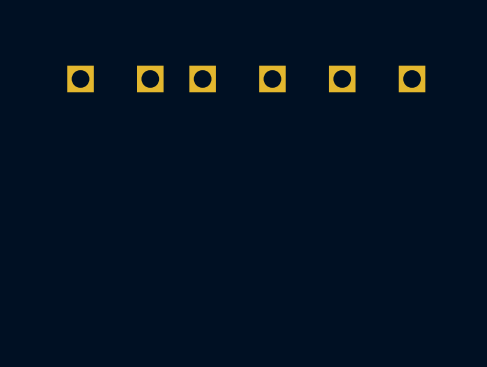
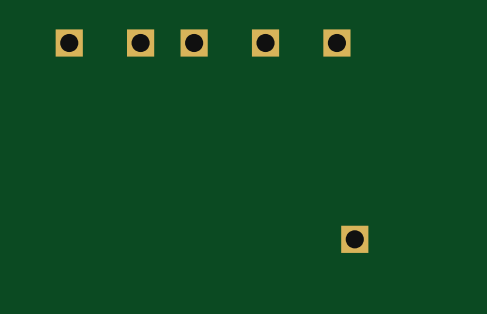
part position: (412, 78) -> (354, 239)

